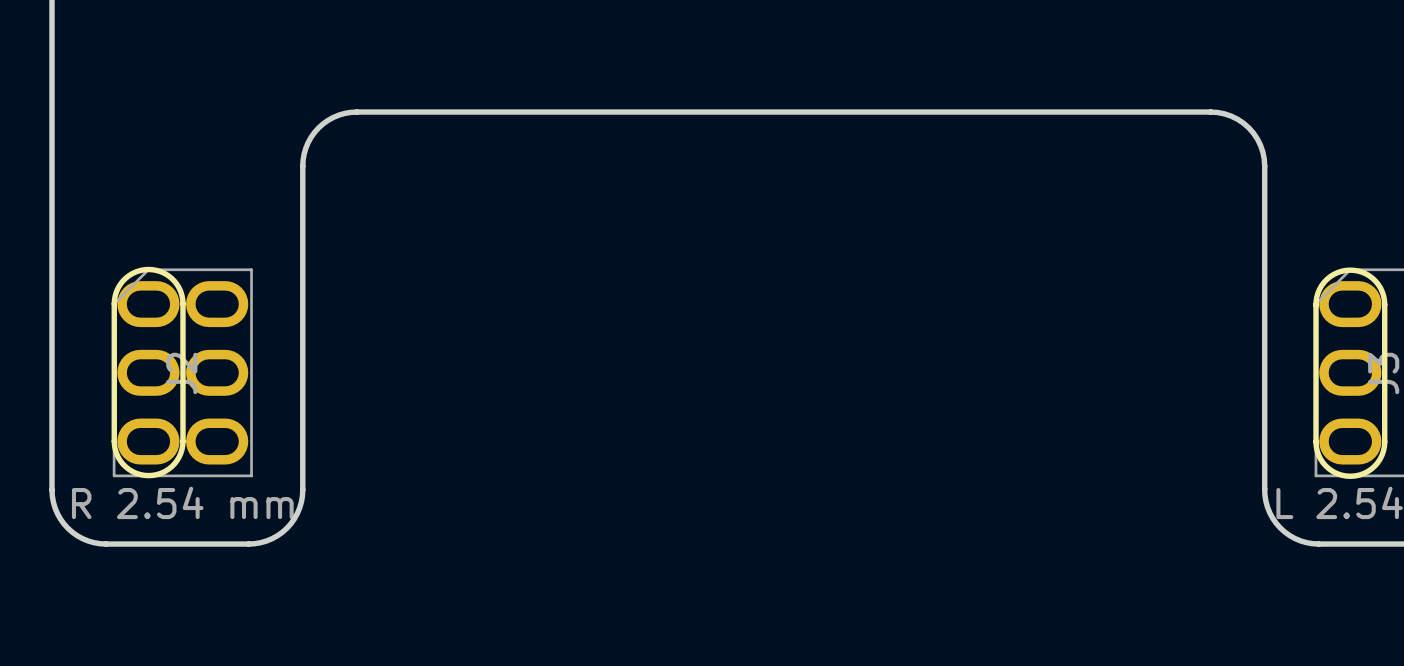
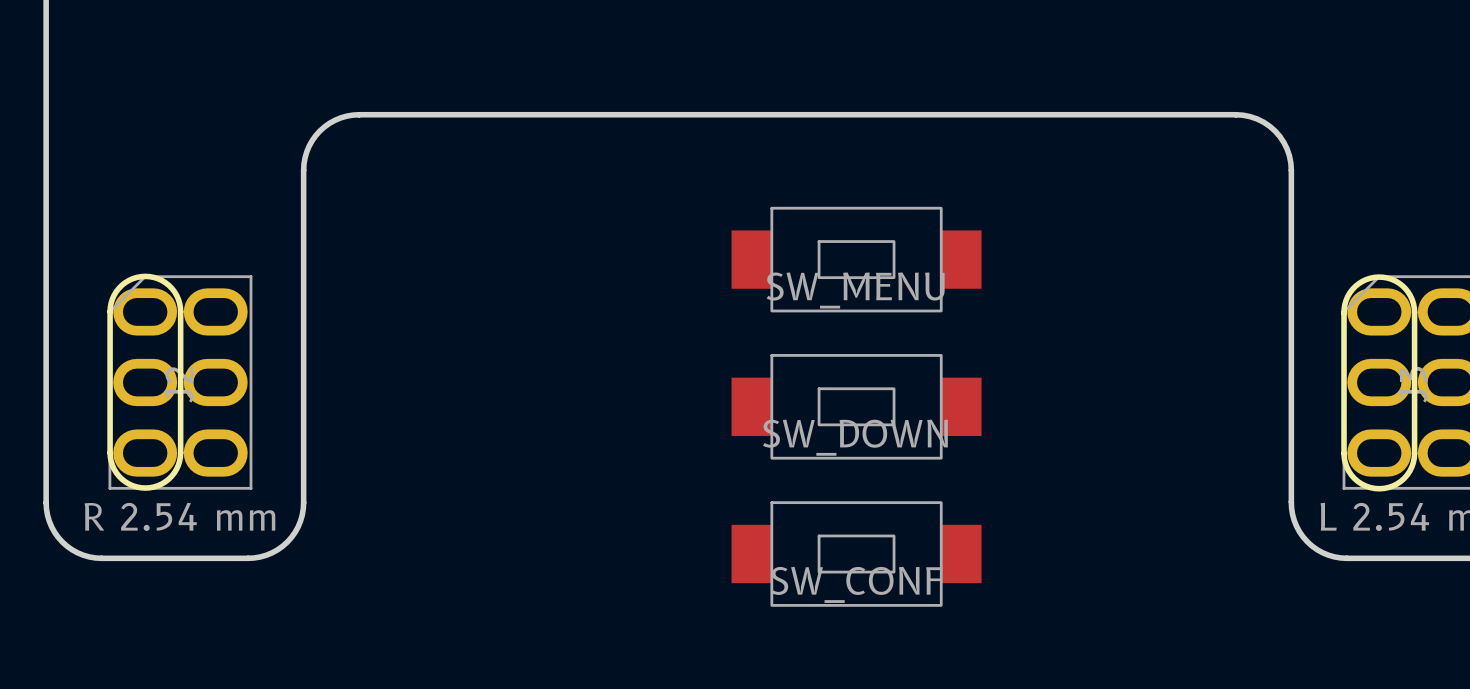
part: none -> SW_MENU (856, 259)
part: none -> SW_DOWN (856, 406)
part: none -> SW_CONF (856, 554)

